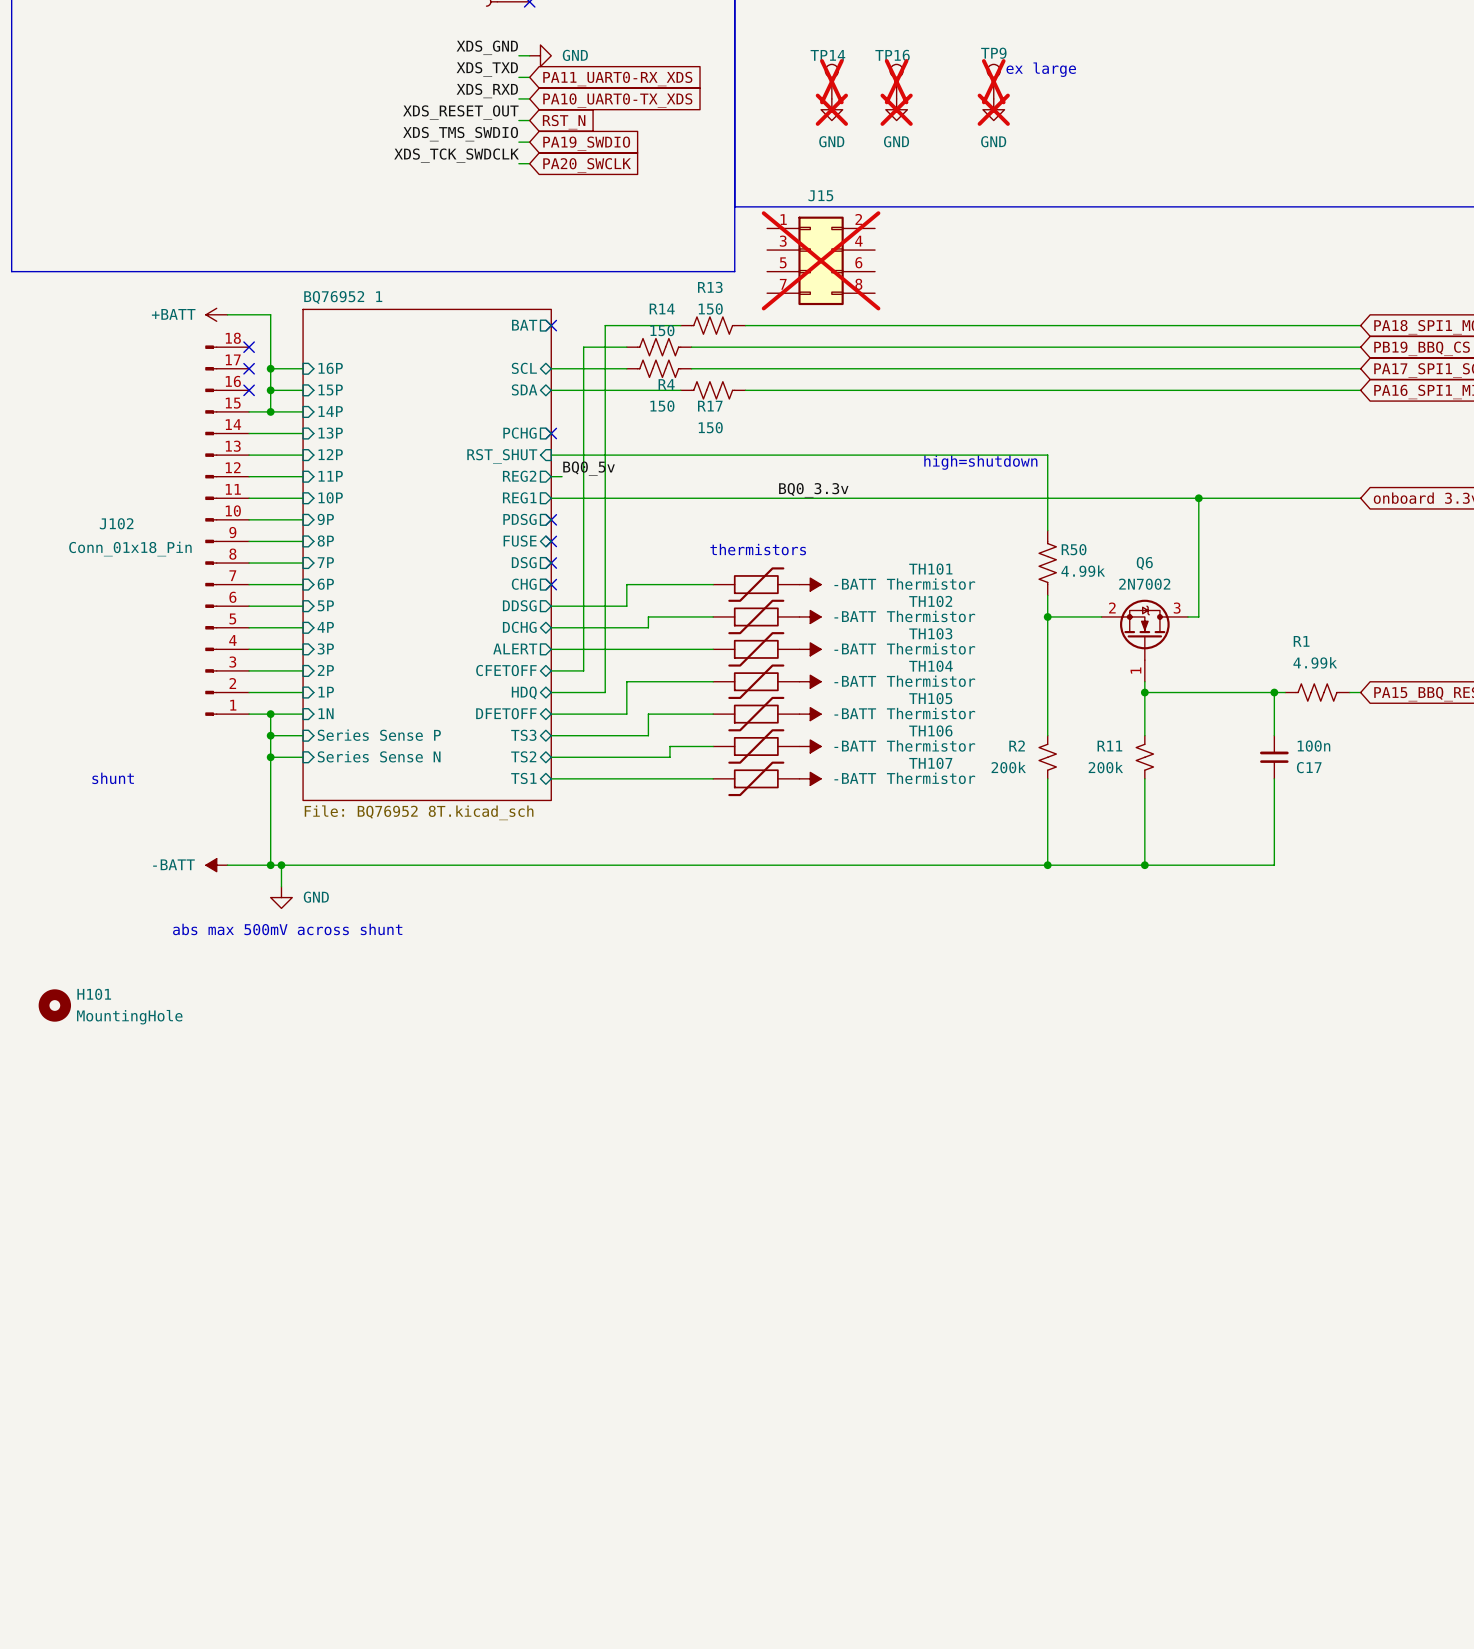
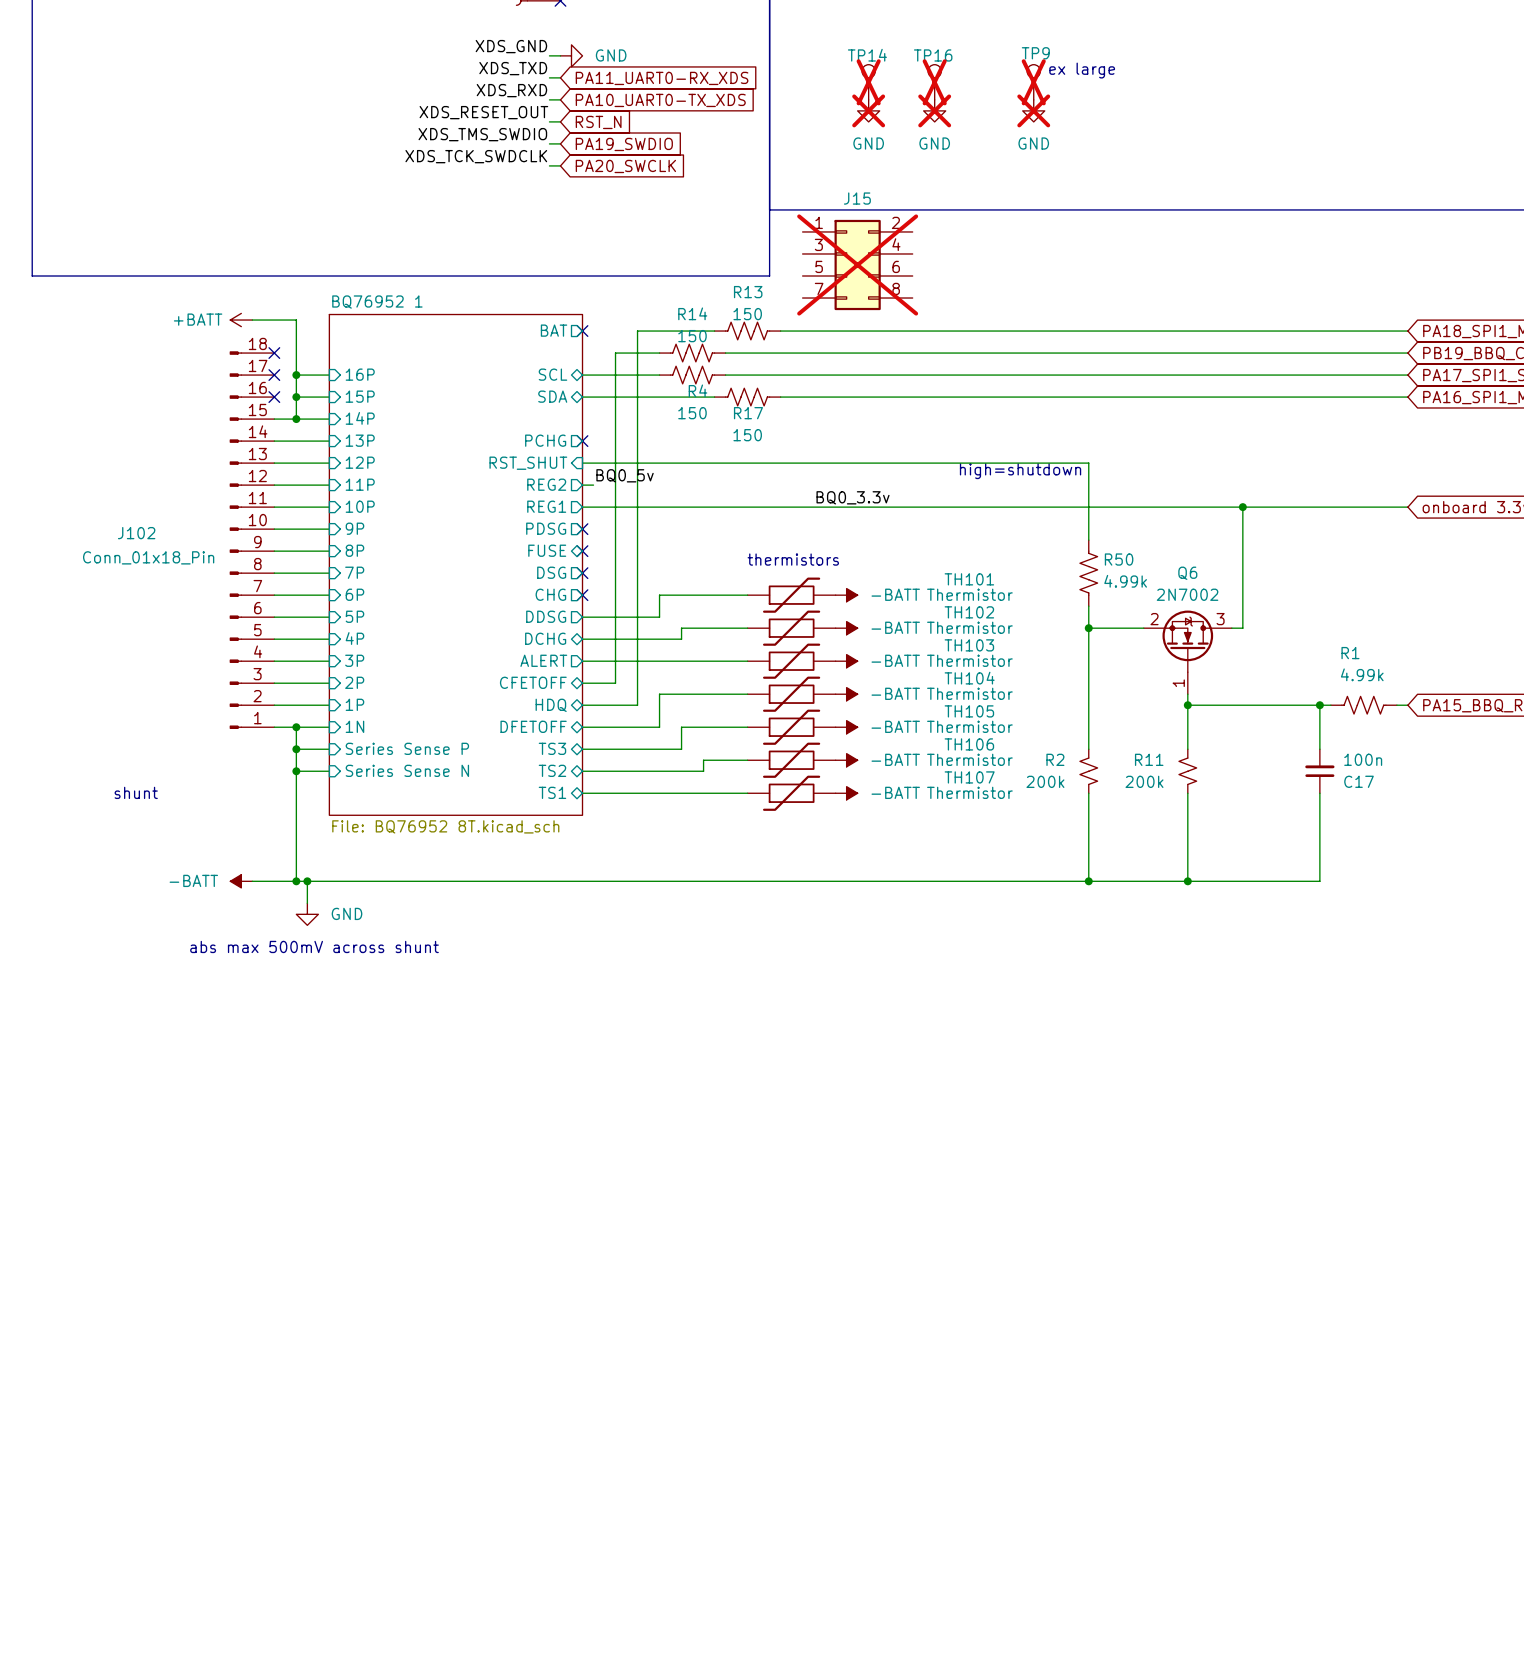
H101: MountingHole (54, 1005) -> none

